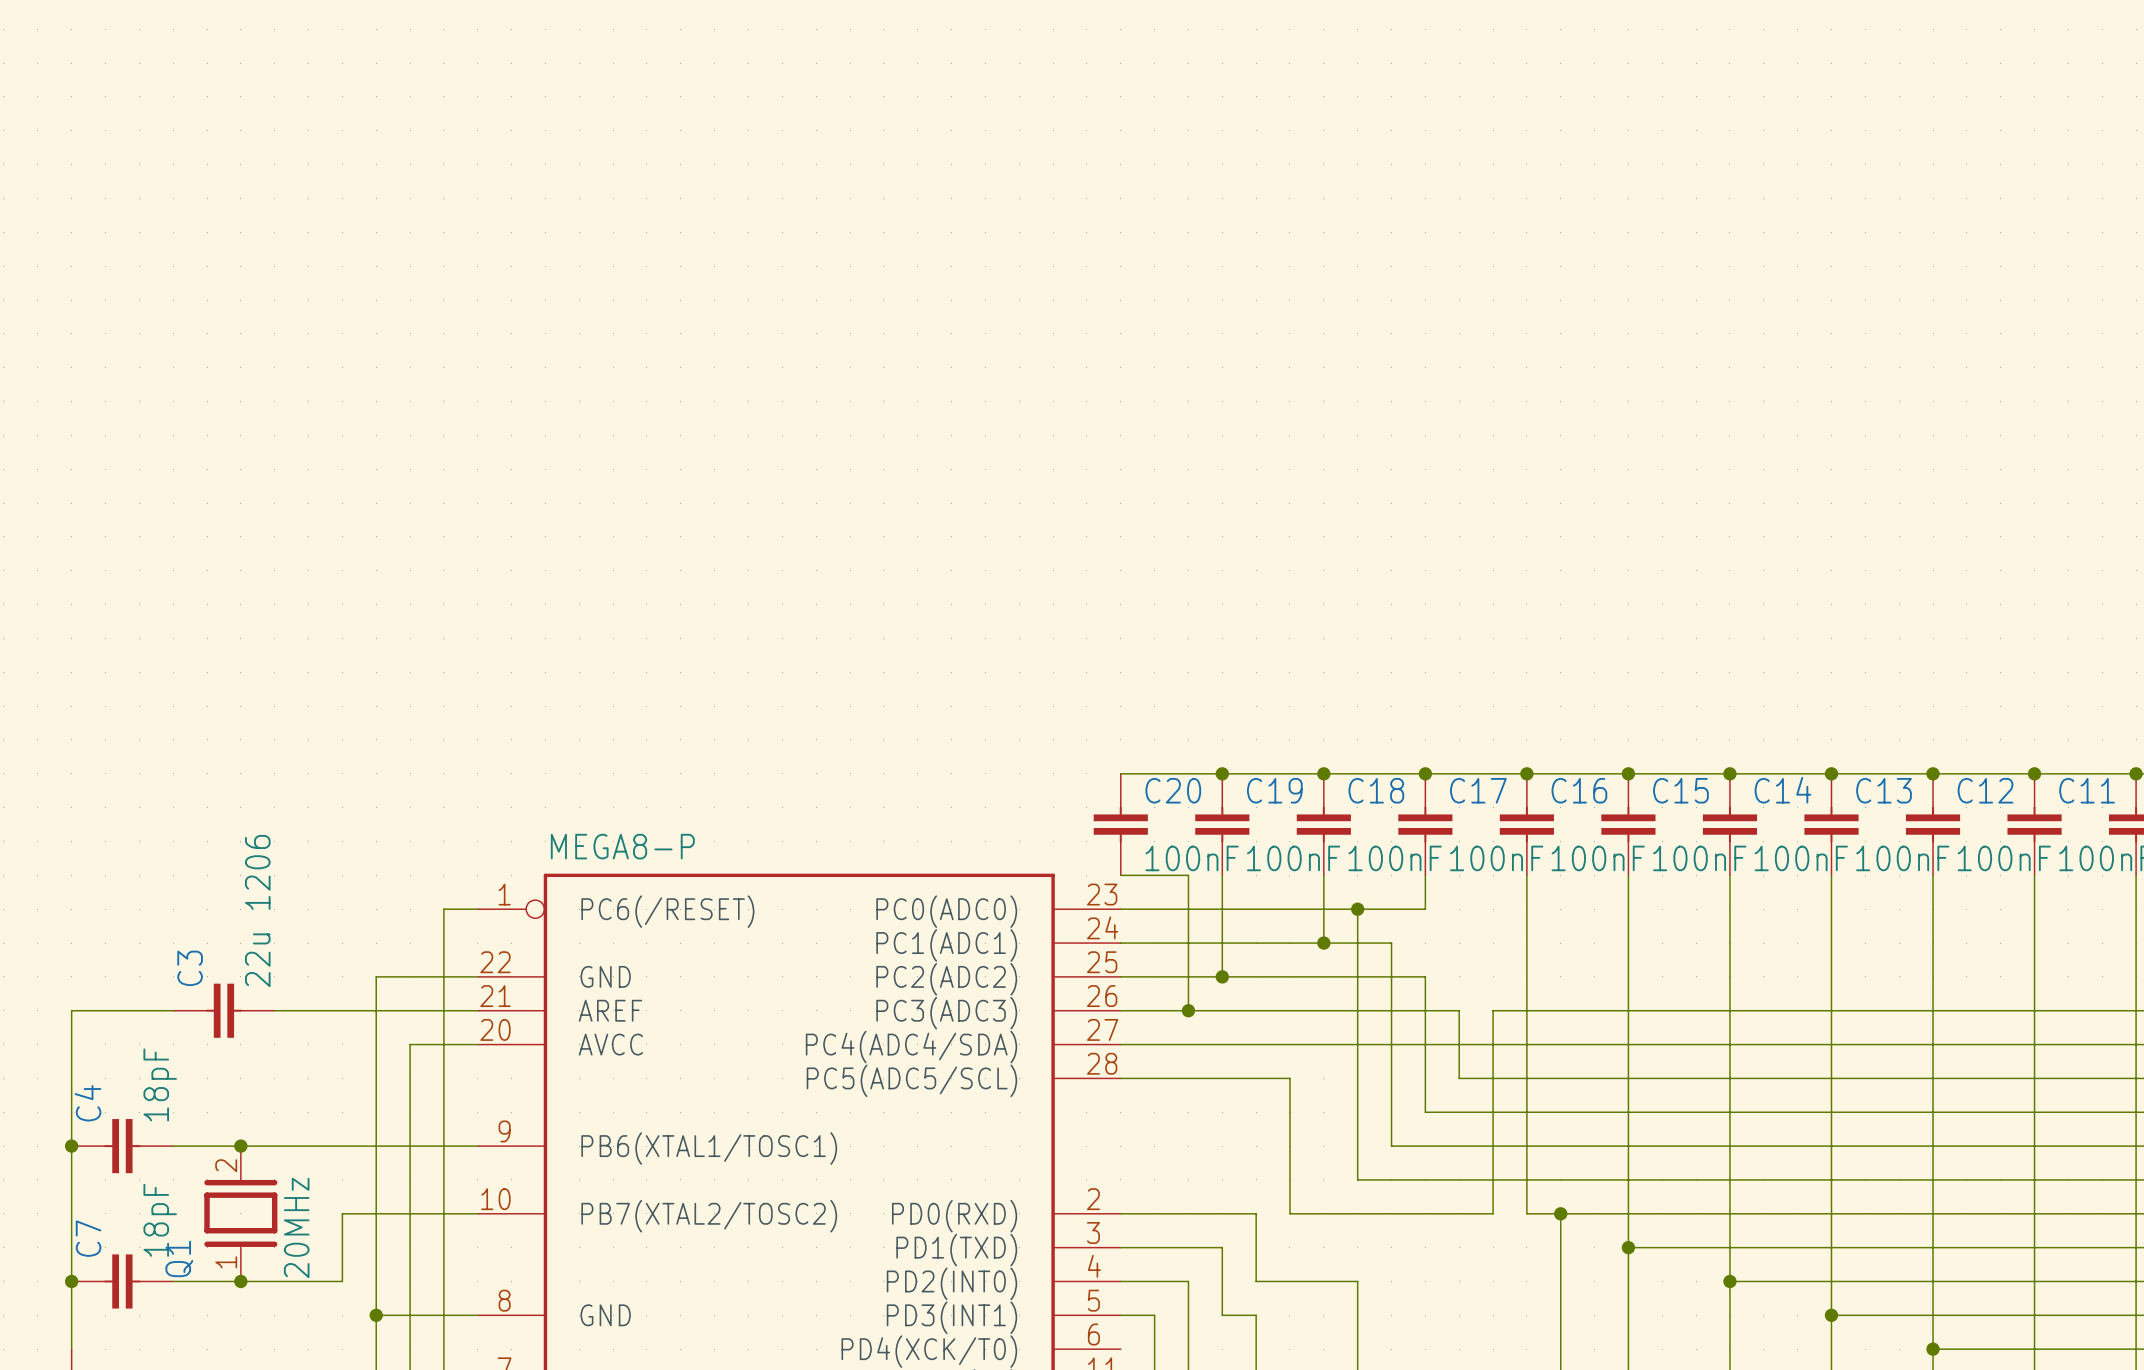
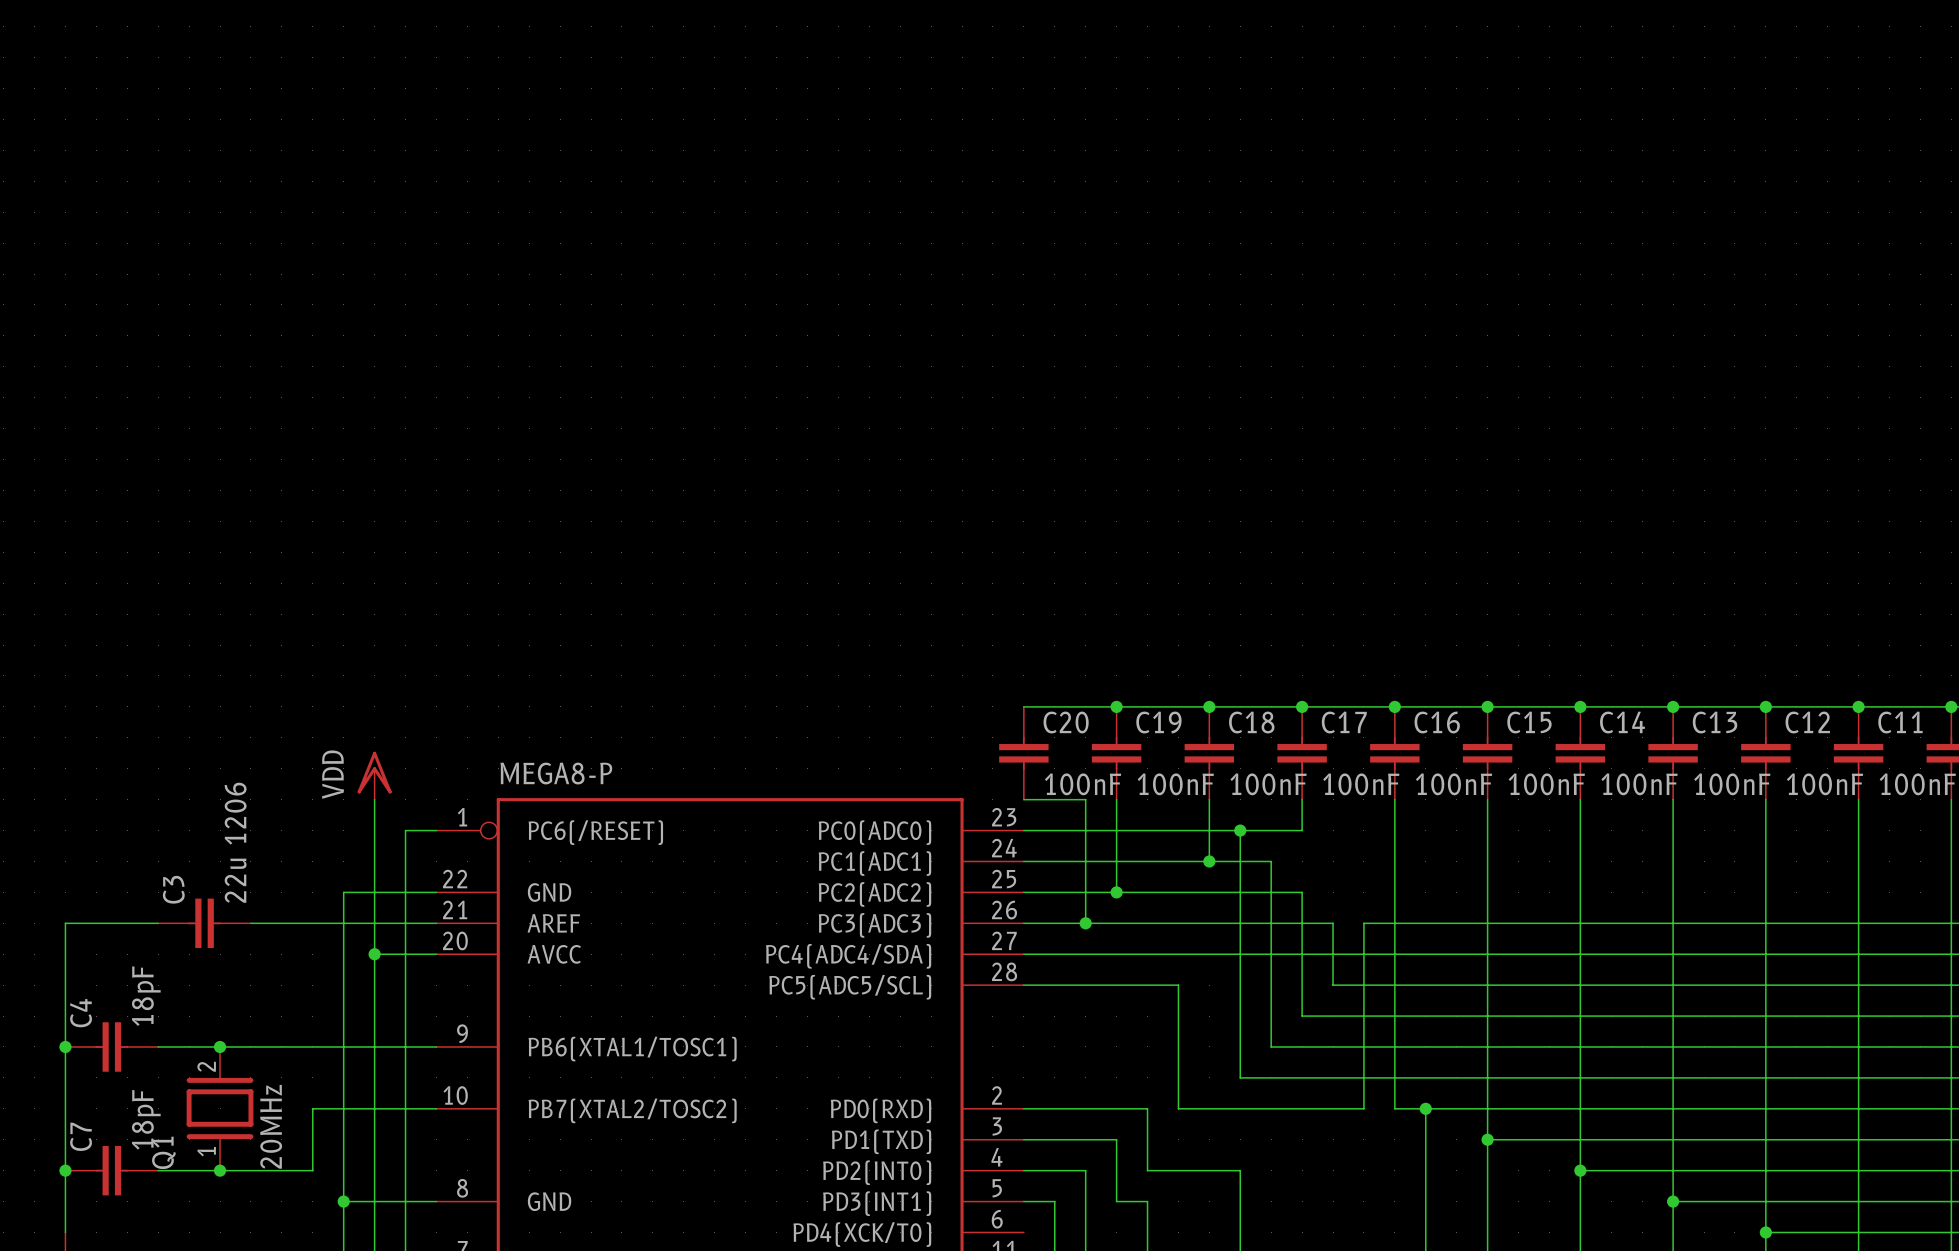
power symbol: none -> VDD (374, 775)
wire: none -> (374, 799) (374, 954)
junction: none -> (374, 954)

